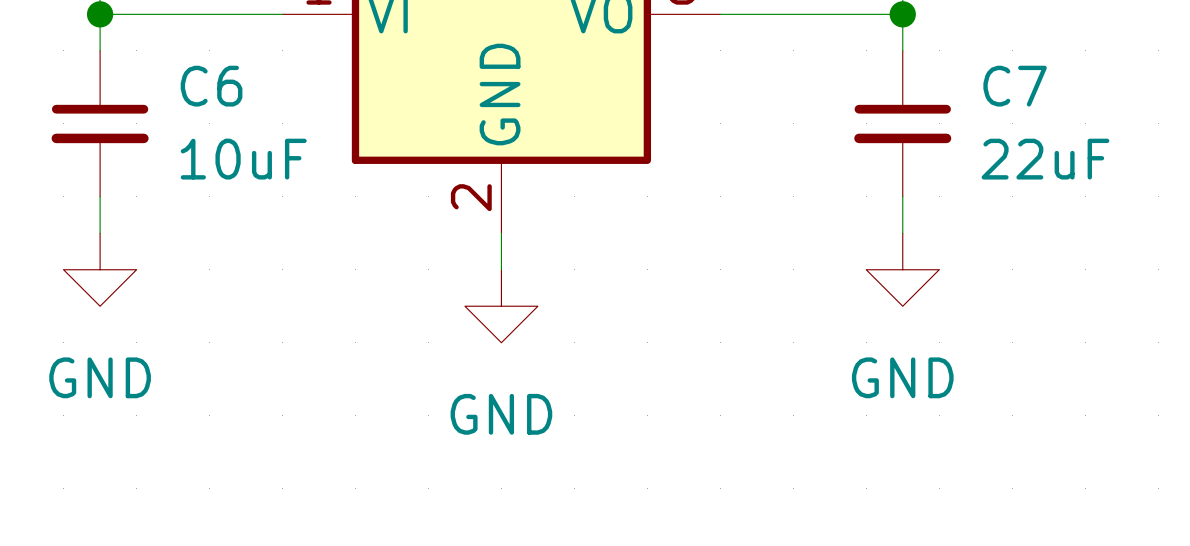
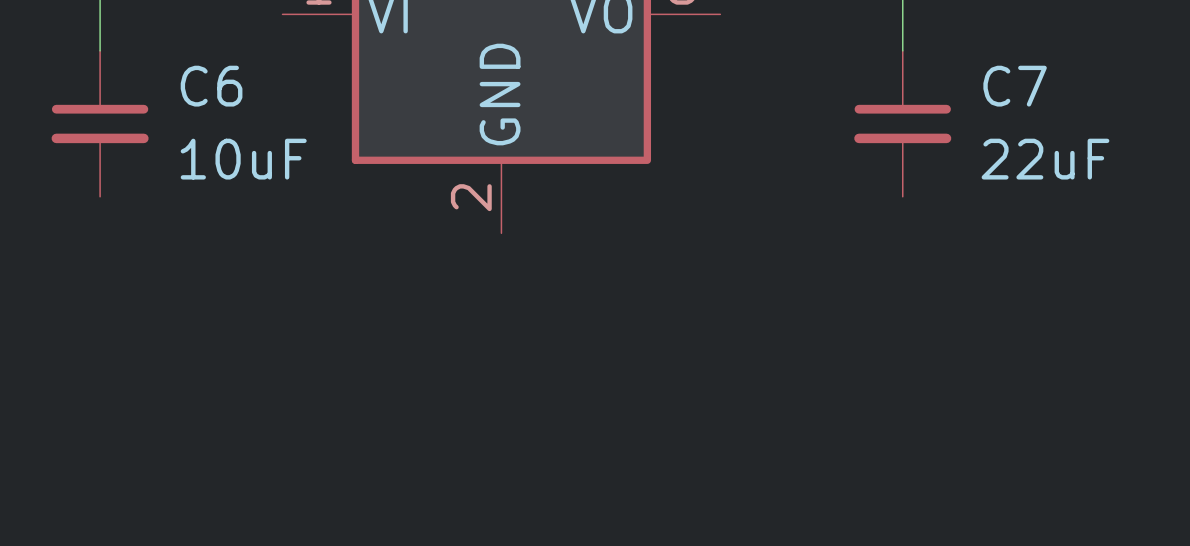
wire: (100, 14) (282, 14) -> none
junction: (100, 14) -> none
wire: (720, 14) (902, 14) -> none
junction: (902, 14) -> none
wire: (100, 196) (100, 233) -> none
wire: (902, 196) (902, 233) -> none
wire: (501, 233) (501, 269) -> none
power symbol: GND (100, 269) -> none
power symbol: GND (902, 269) -> none
power symbol: GND (501, 306) -> none

